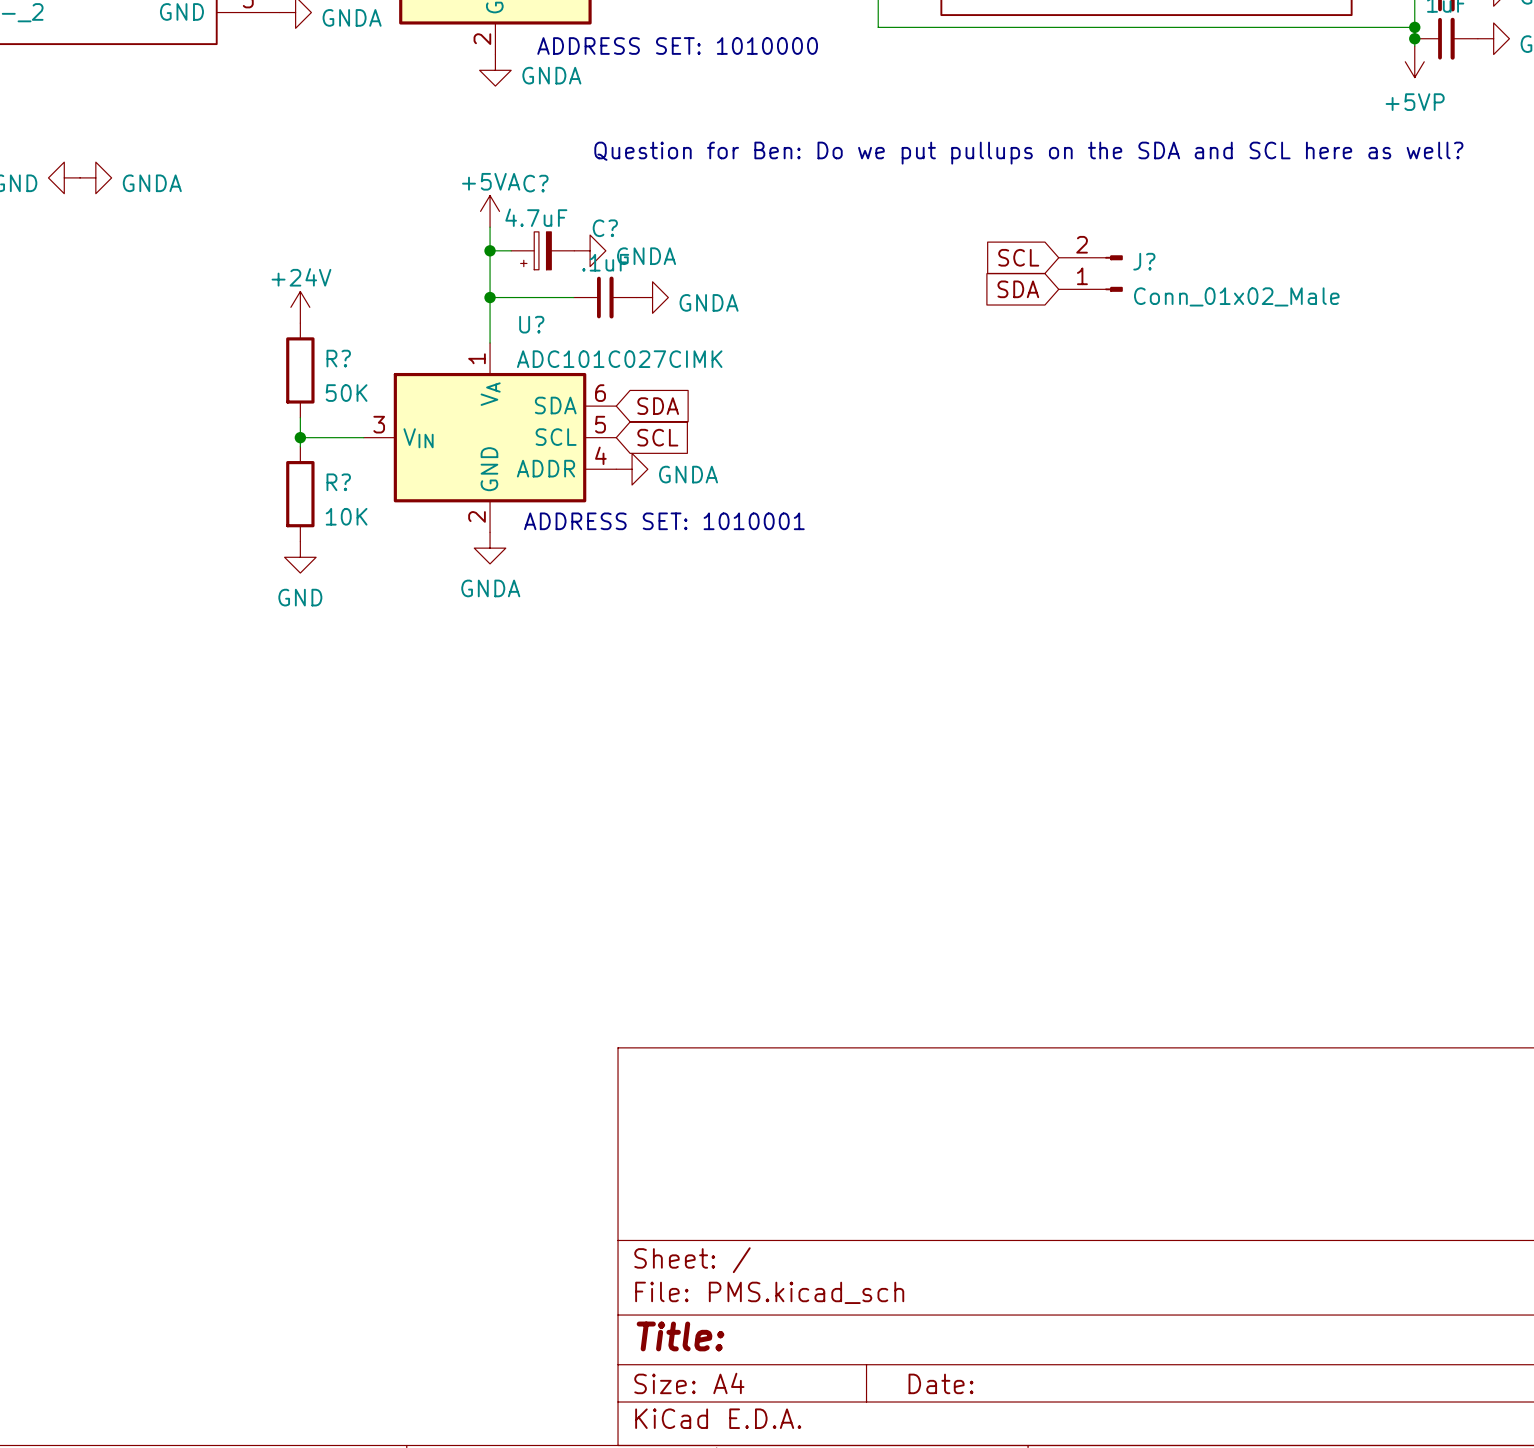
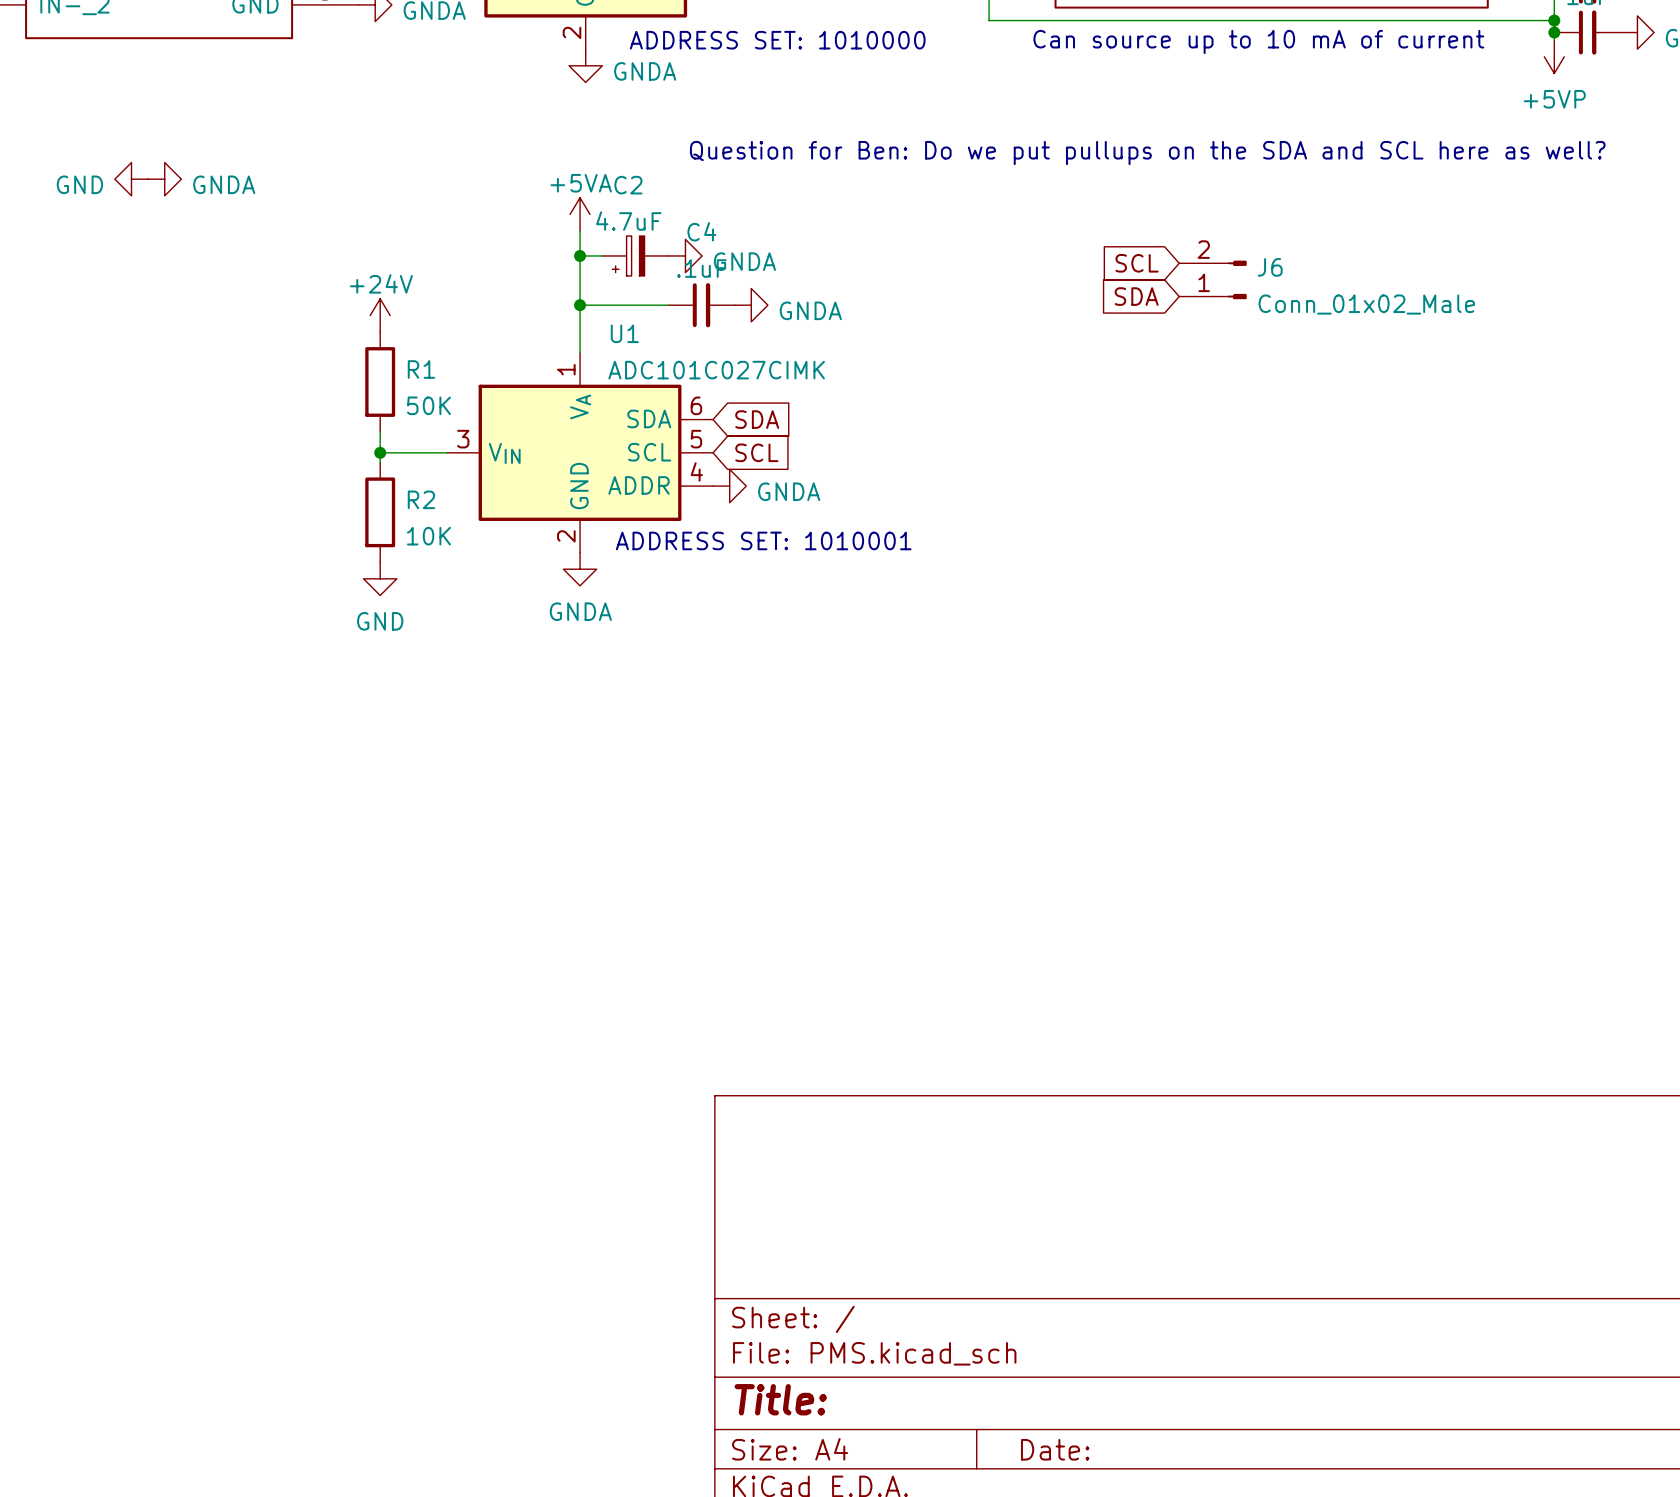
text: none -> Can source up to 10 mA of current (1258, 41)
C? name: C? (535, 183) -> C2 (628, 185)
C? name: C? (605, 228) -> C4 (701, 231)
J? name: J? (1144, 261) -> J6 (1270, 267)
U? name: U? (531, 324) -> U1 (624, 333)
R? name: R? (338, 358) -> R1 (421, 369)
R? name: R? (338, 482) -> R2 (421, 499)

